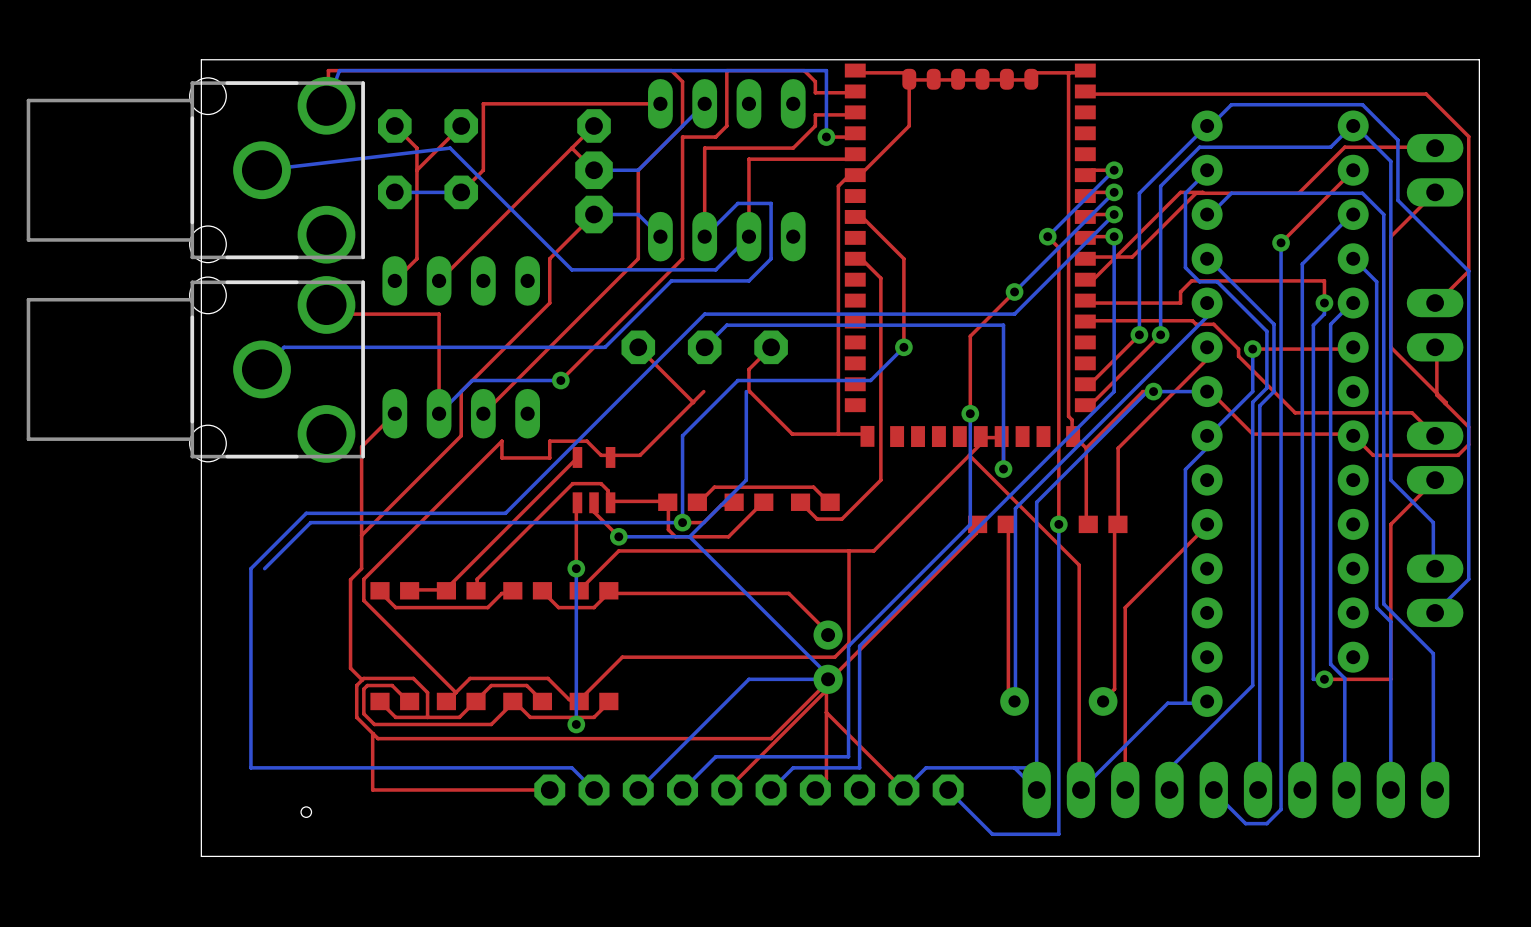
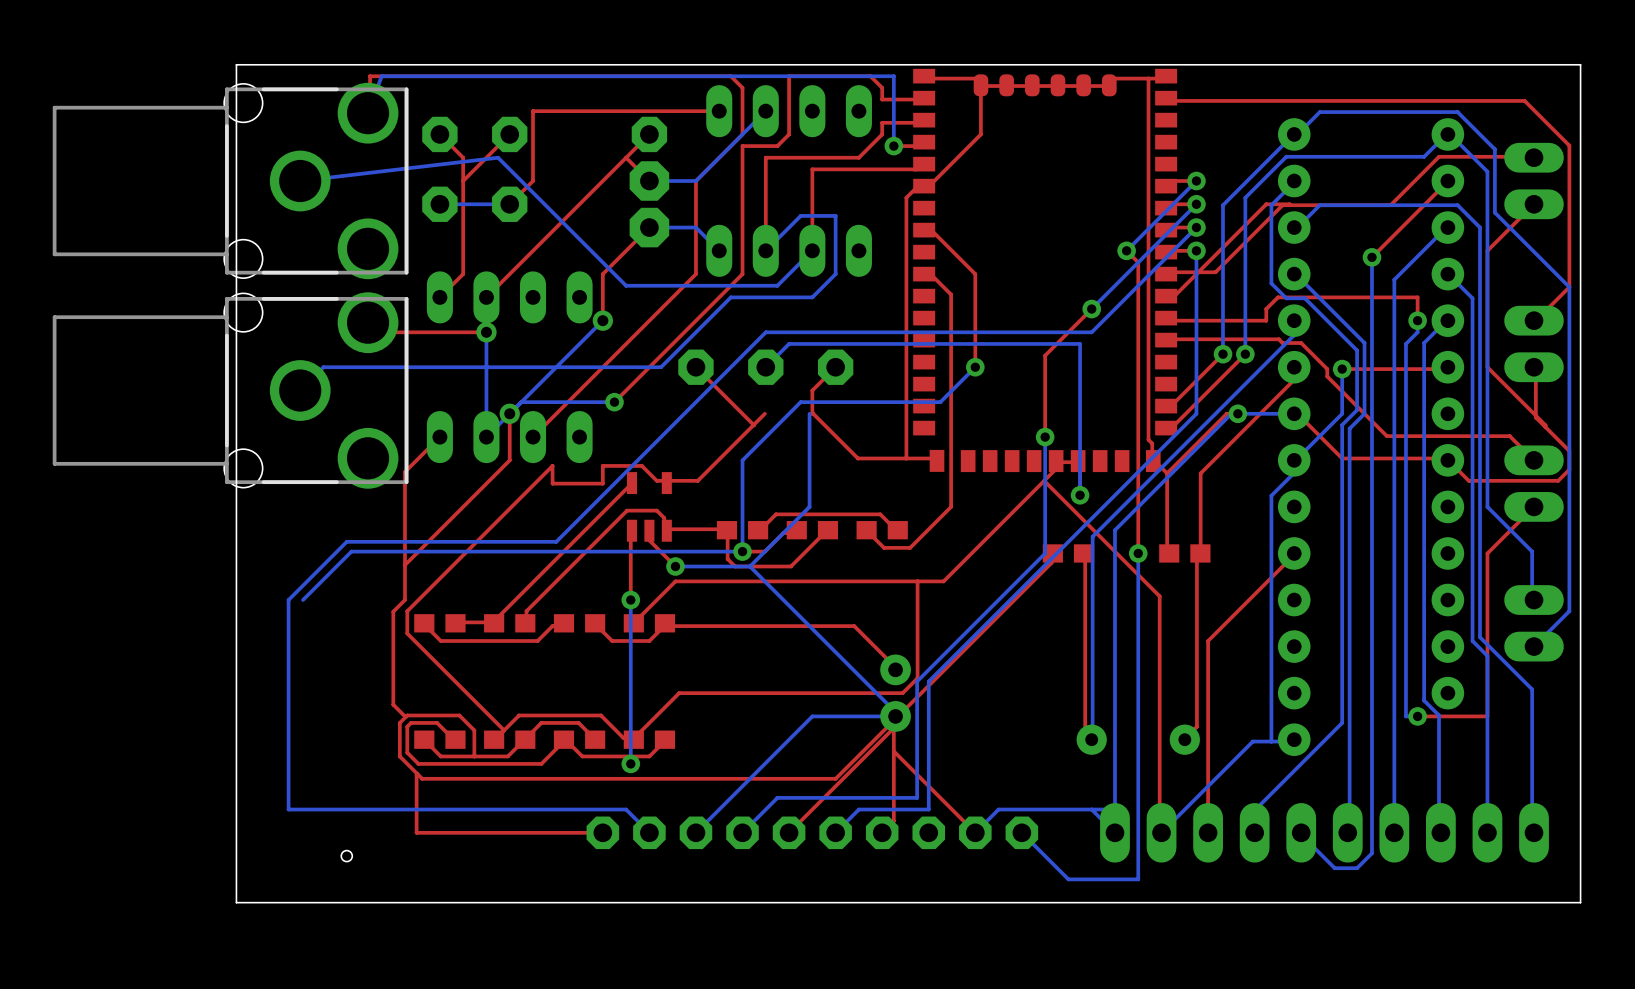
top track: (549, 303) (461, 391) -> none
bottom track: none -> (602, 320) (521, 402)
via: none -> (602, 320)
top track: (439, 314) (439, 413) -> none
bottom track: none -> (486, 332) (486, 437)
via: none -> (486, 332)
via: none -> (509, 413)

